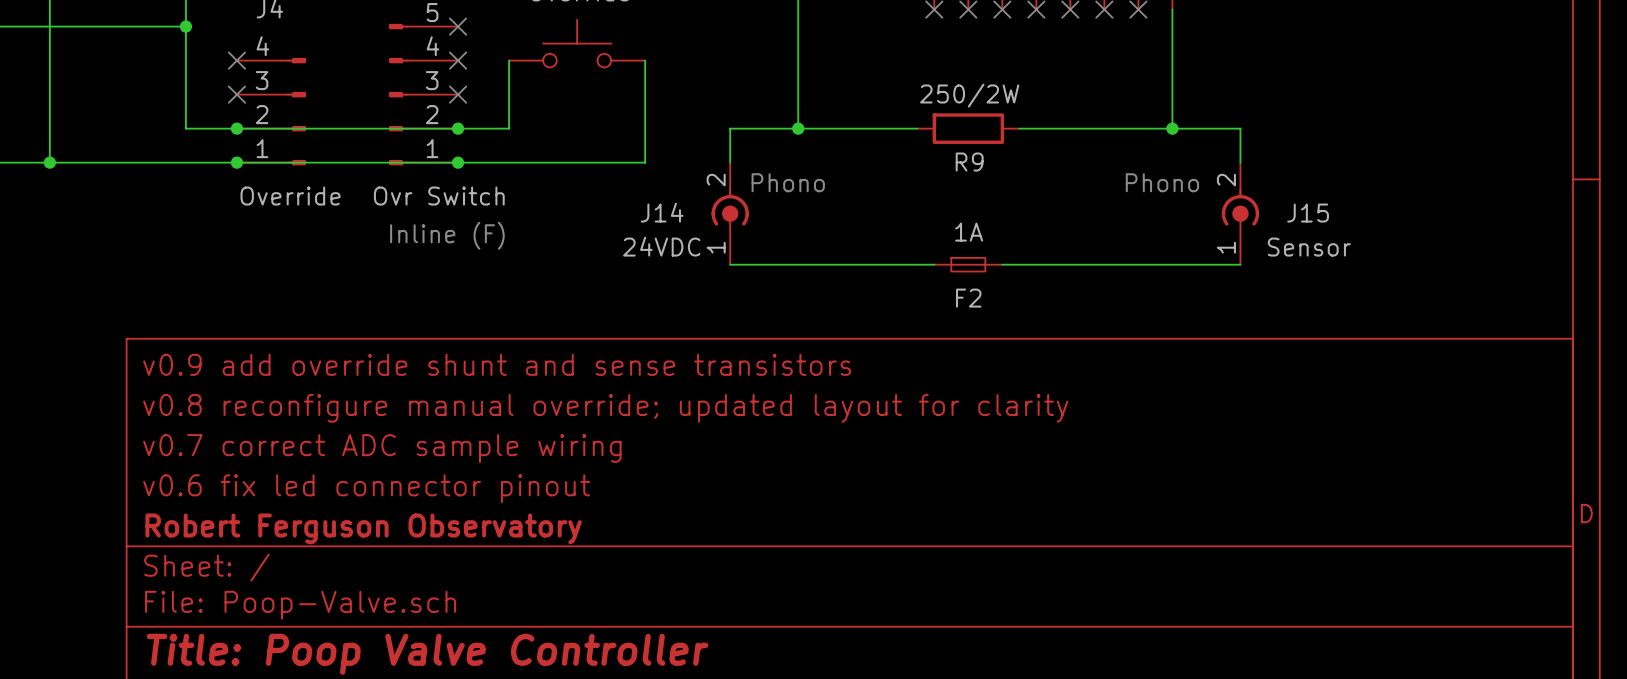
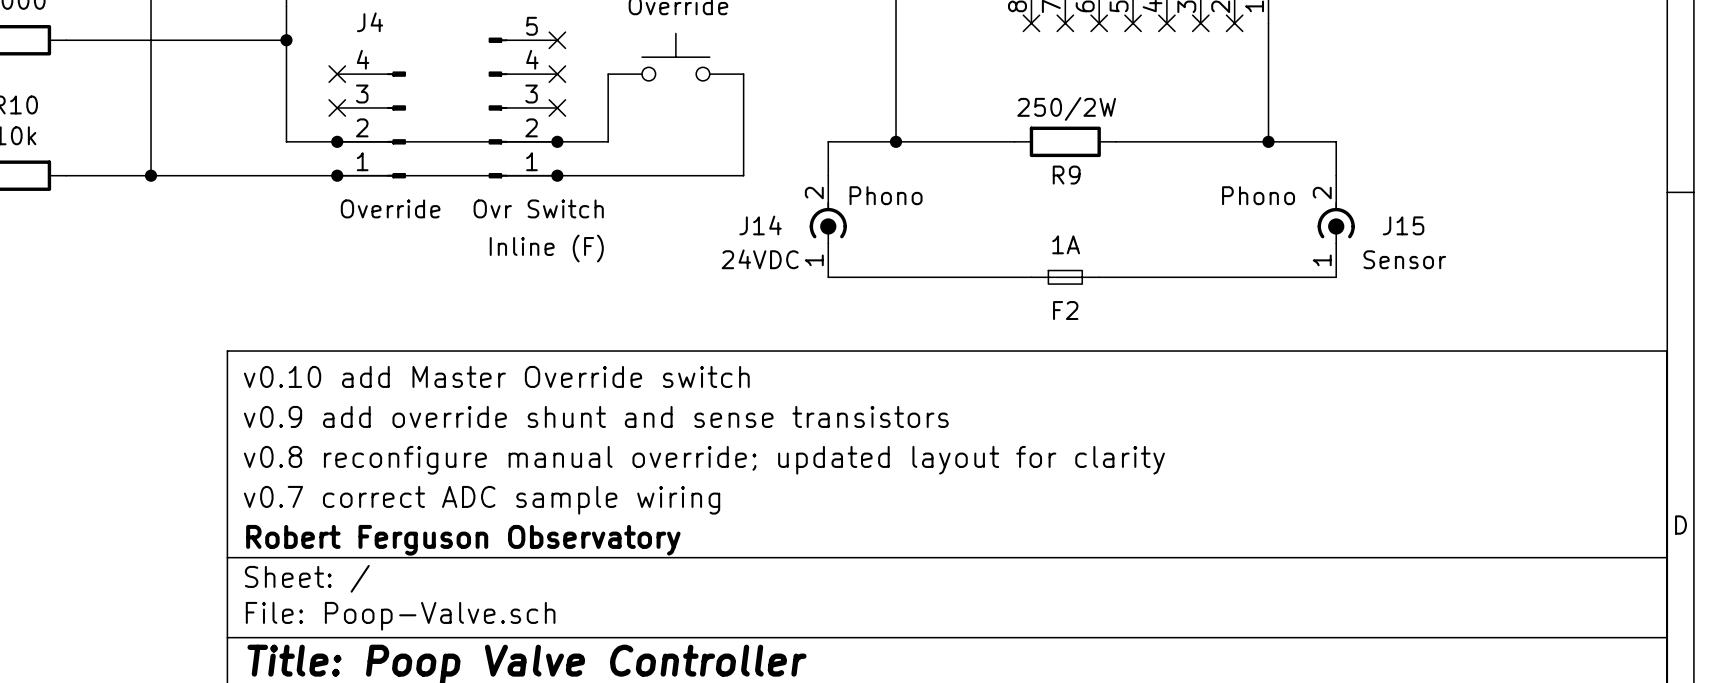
title block: v0.9 add override shunt and sense transistors (497, 364) -> v0.10 add Master Override switch (496, 376)
title block: v0.8 reconfigure manual override; updated layout for clarity (605, 408) -> v0.9 add override shunt and sense transistors (596, 416)
title block: v0.7 correct ADC sample wiring (382, 448) -> v0.8 reconfigure manual override; updated layout for clarity (704, 460)
title block: v0.6 fix led connector pinout (366, 488) -> v0.7 correct ADC sample wiring (482, 500)

